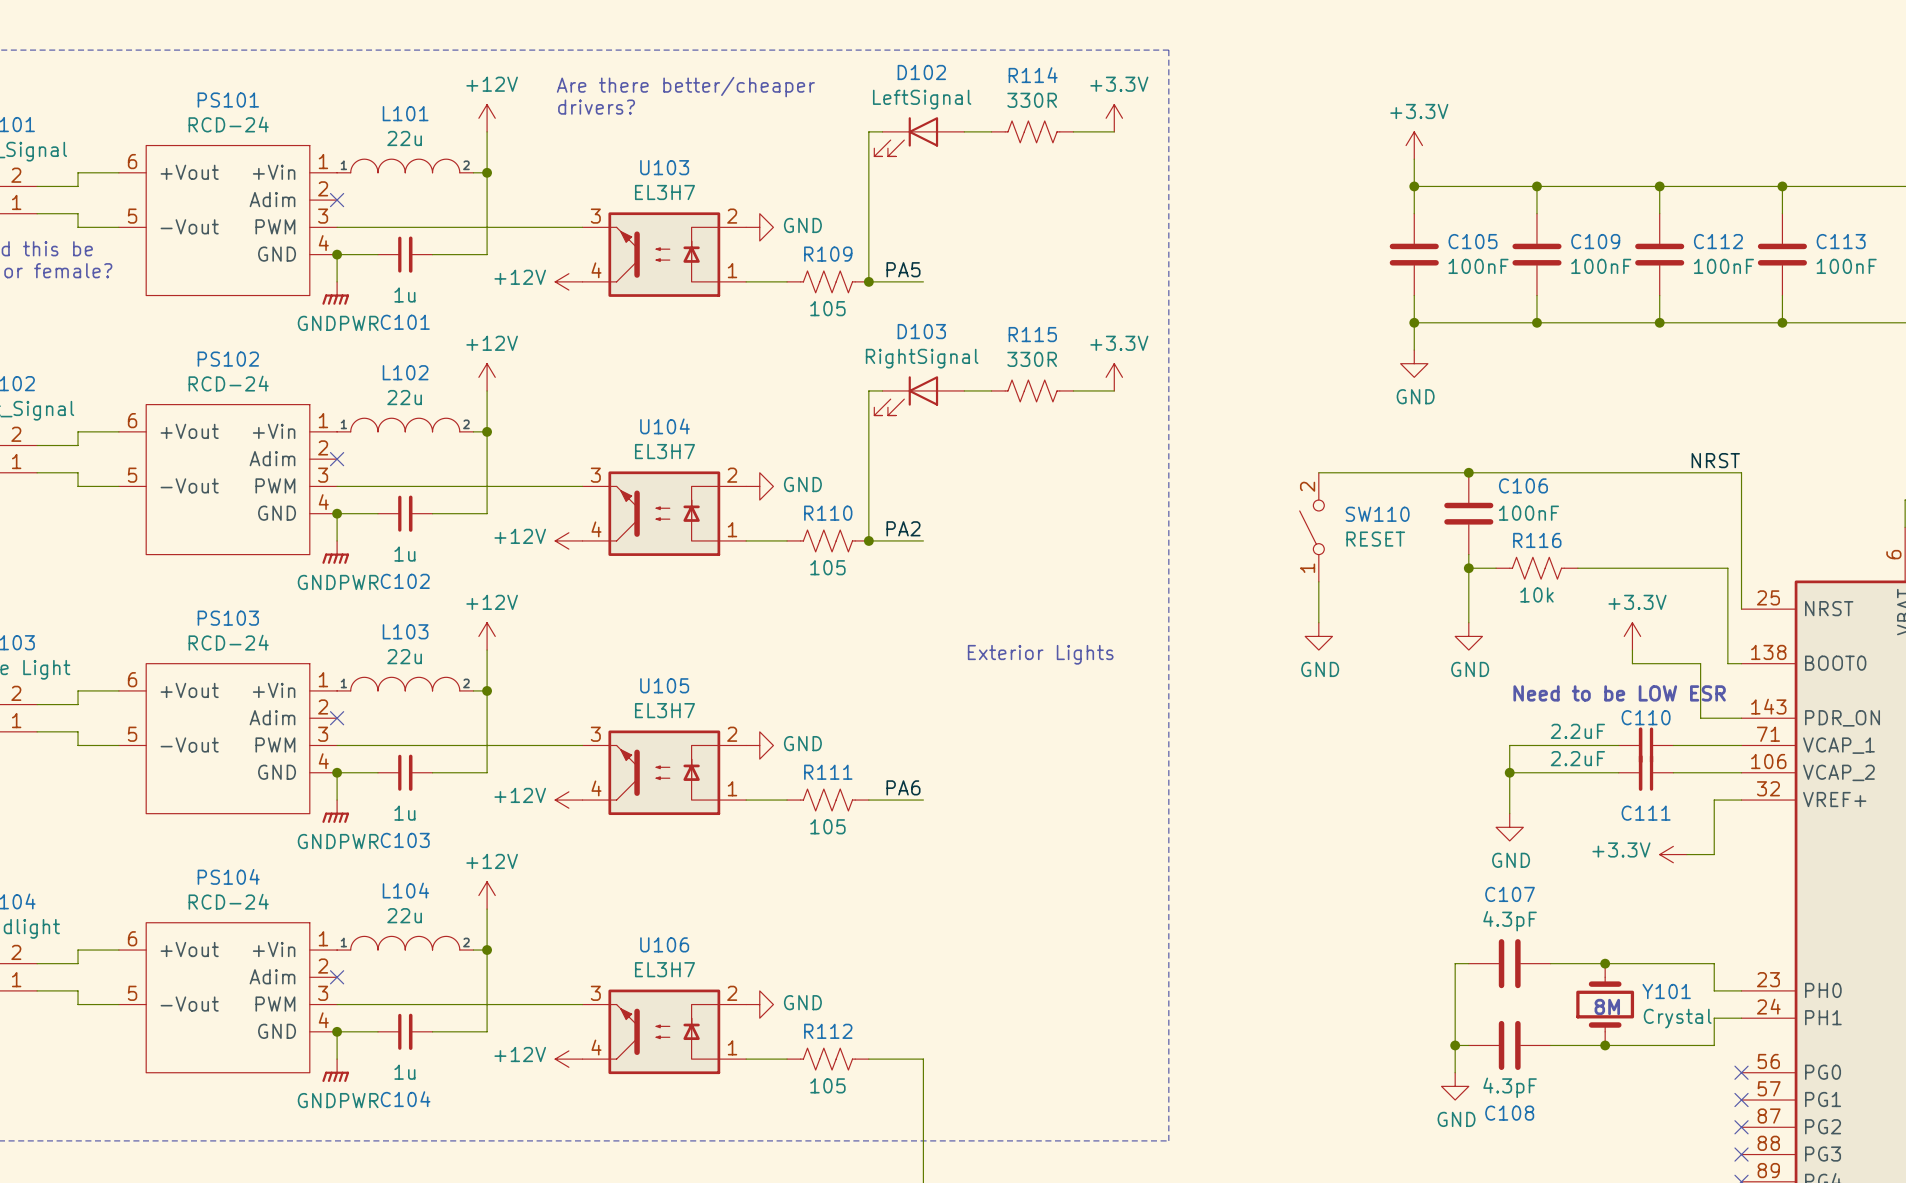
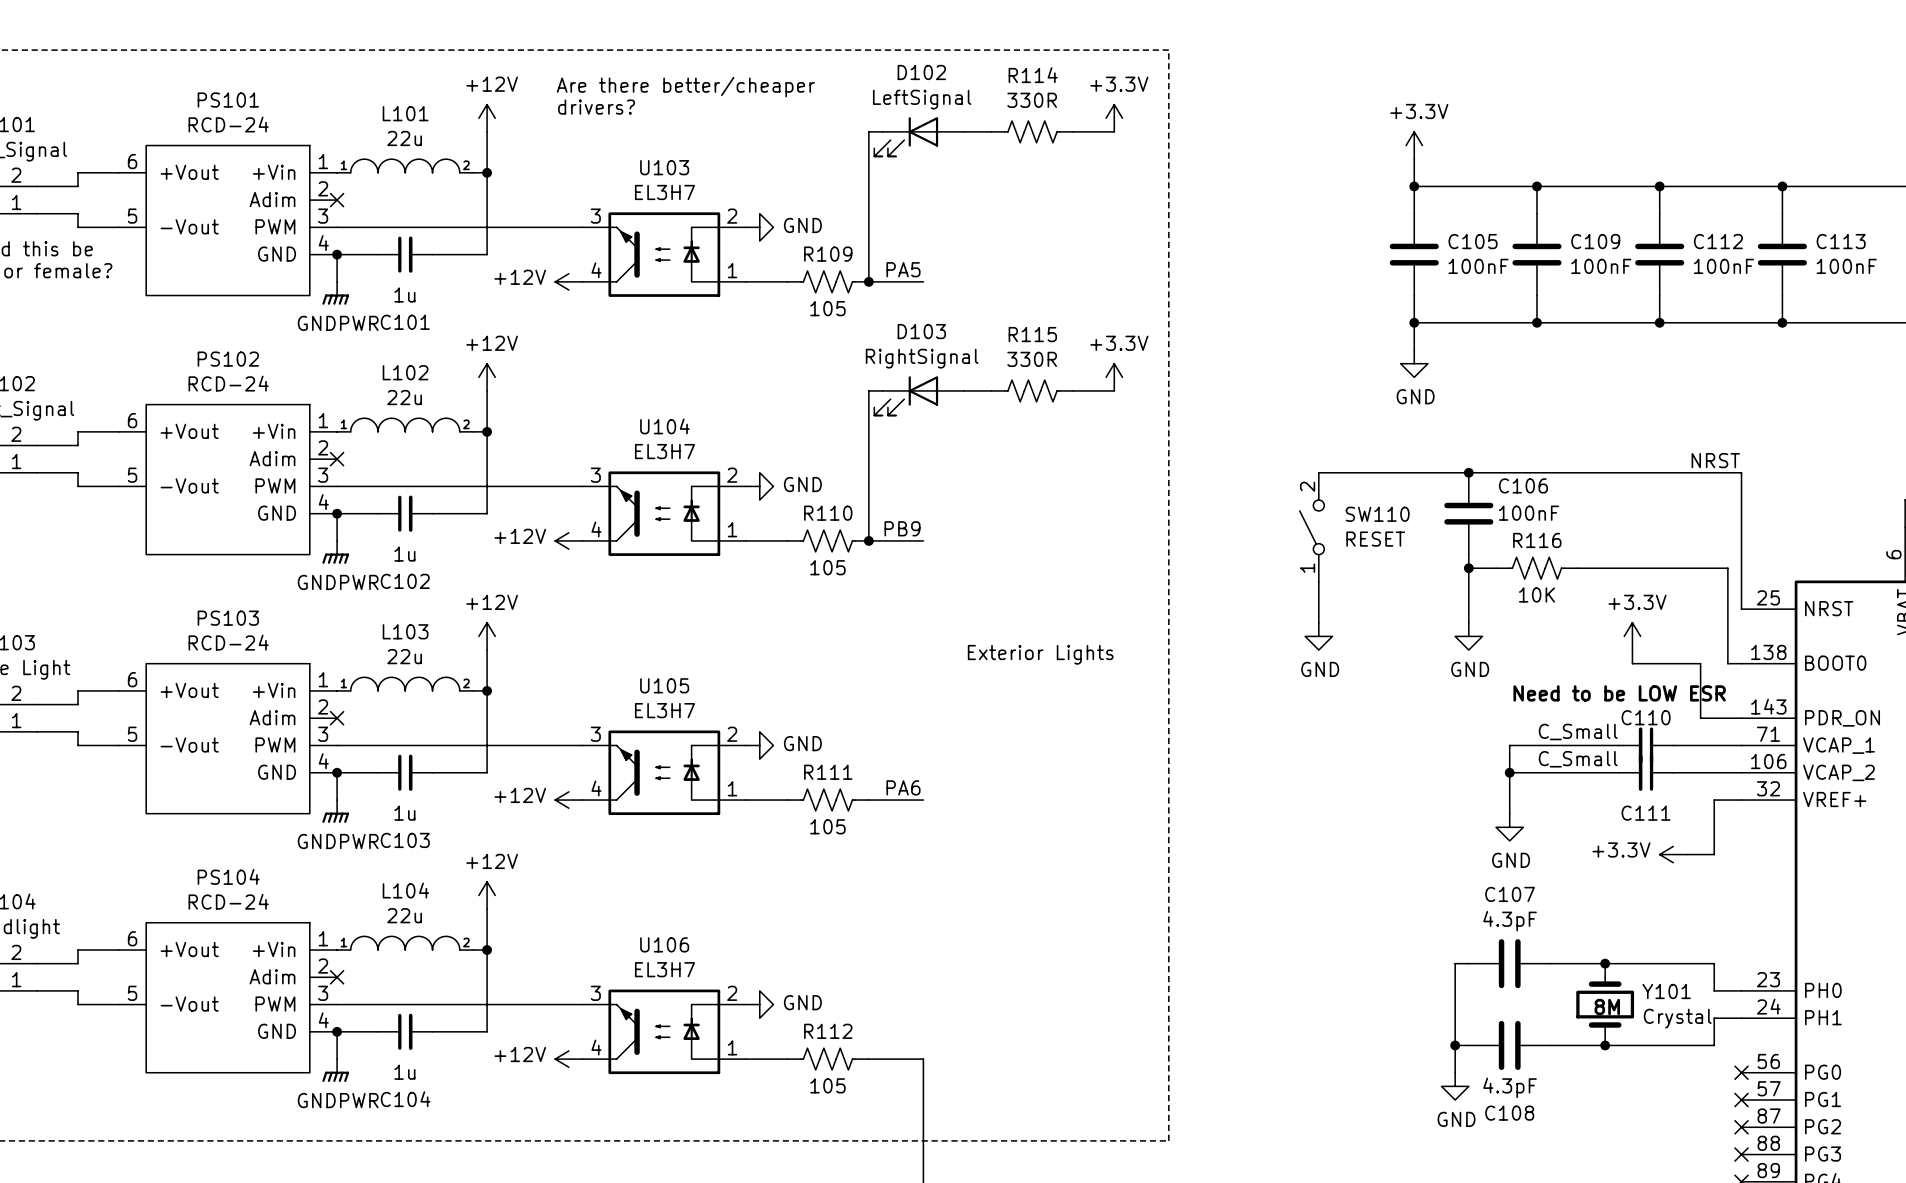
label: PA2 (903, 528) -> PB9 (902, 528)
R116 value: 10k (1536, 594) -> 10K (1536, 594)
C110 value: 2.2uF (1577, 731) -> C_Small (1578, 731)
C111 value: 2.2uF (1577, 758) -> C_Small (1578, 759)

